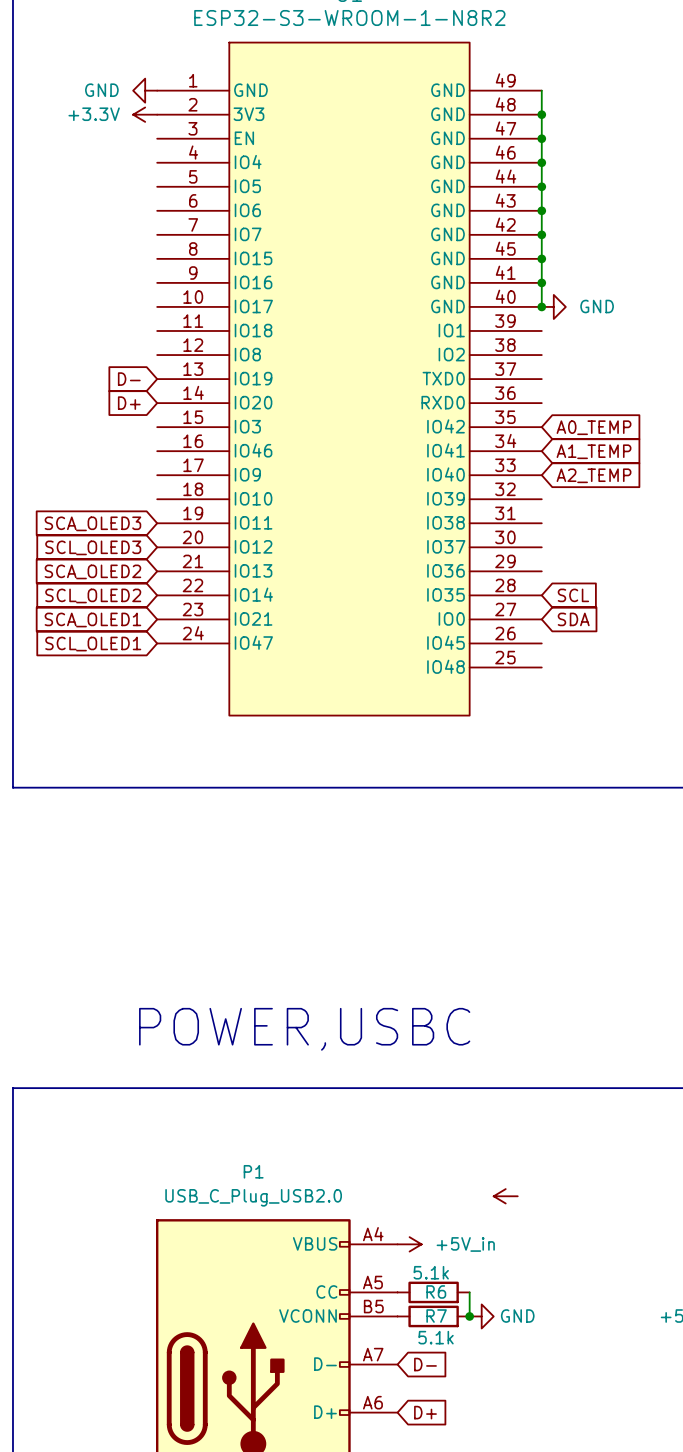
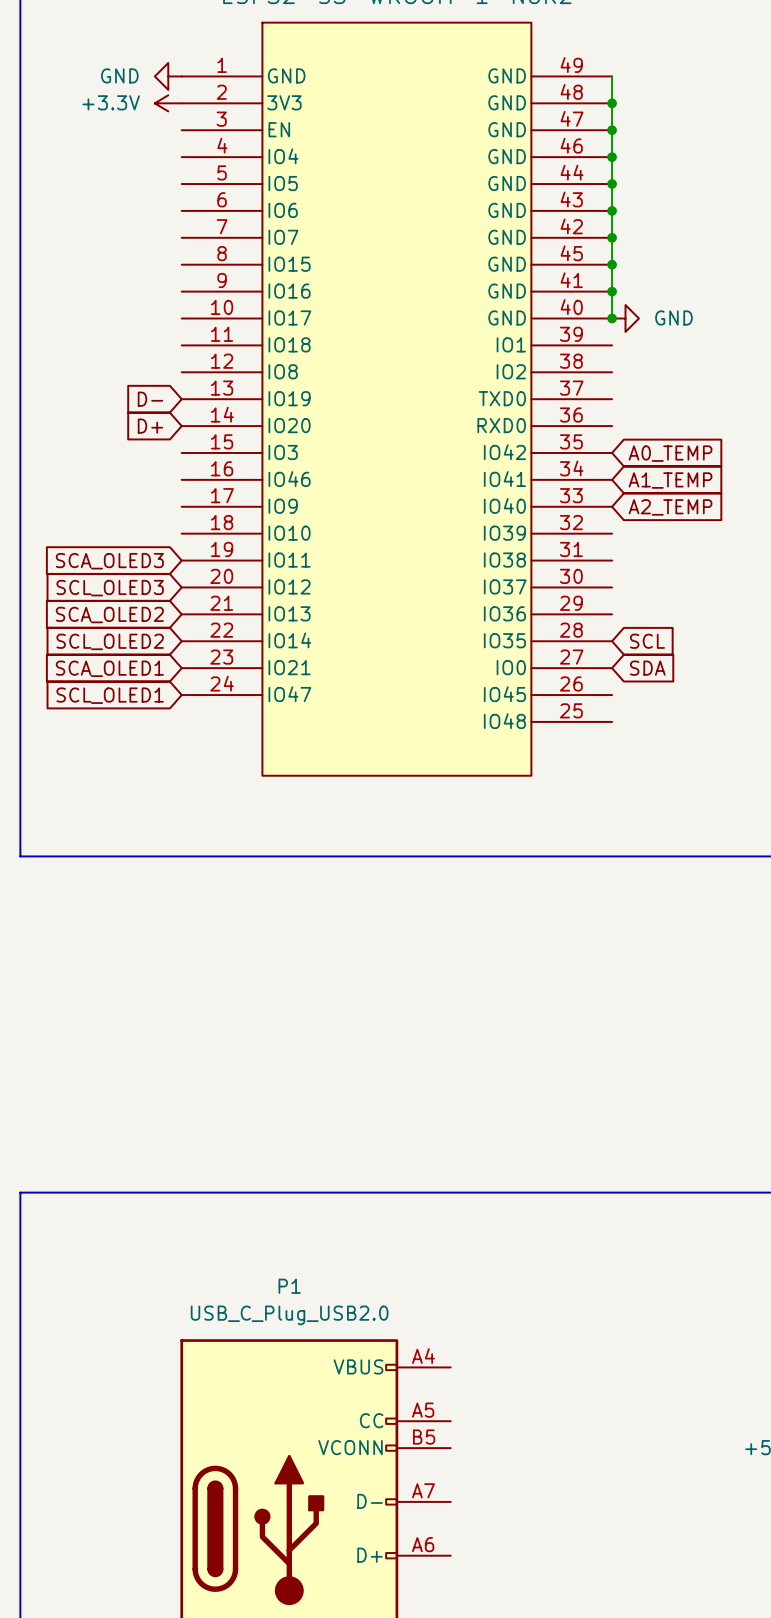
text: POWER,USBC (304, 1029) -> none
power symbol: (505, 1196) -> none
power symbol: +5V_in (409, 1244) -> none
R6: 5.1k (433, 1292) -> none
wire: (469, 1292) (469, 1316) -> none
R7: 5.1k (433, 1316) -> none
junction: (469, 1316) -> none
power symbol: GND (481, 1316) -> none
global label: D- (425, 1364) -> none
global label: D+ (425, 1412) -> none

